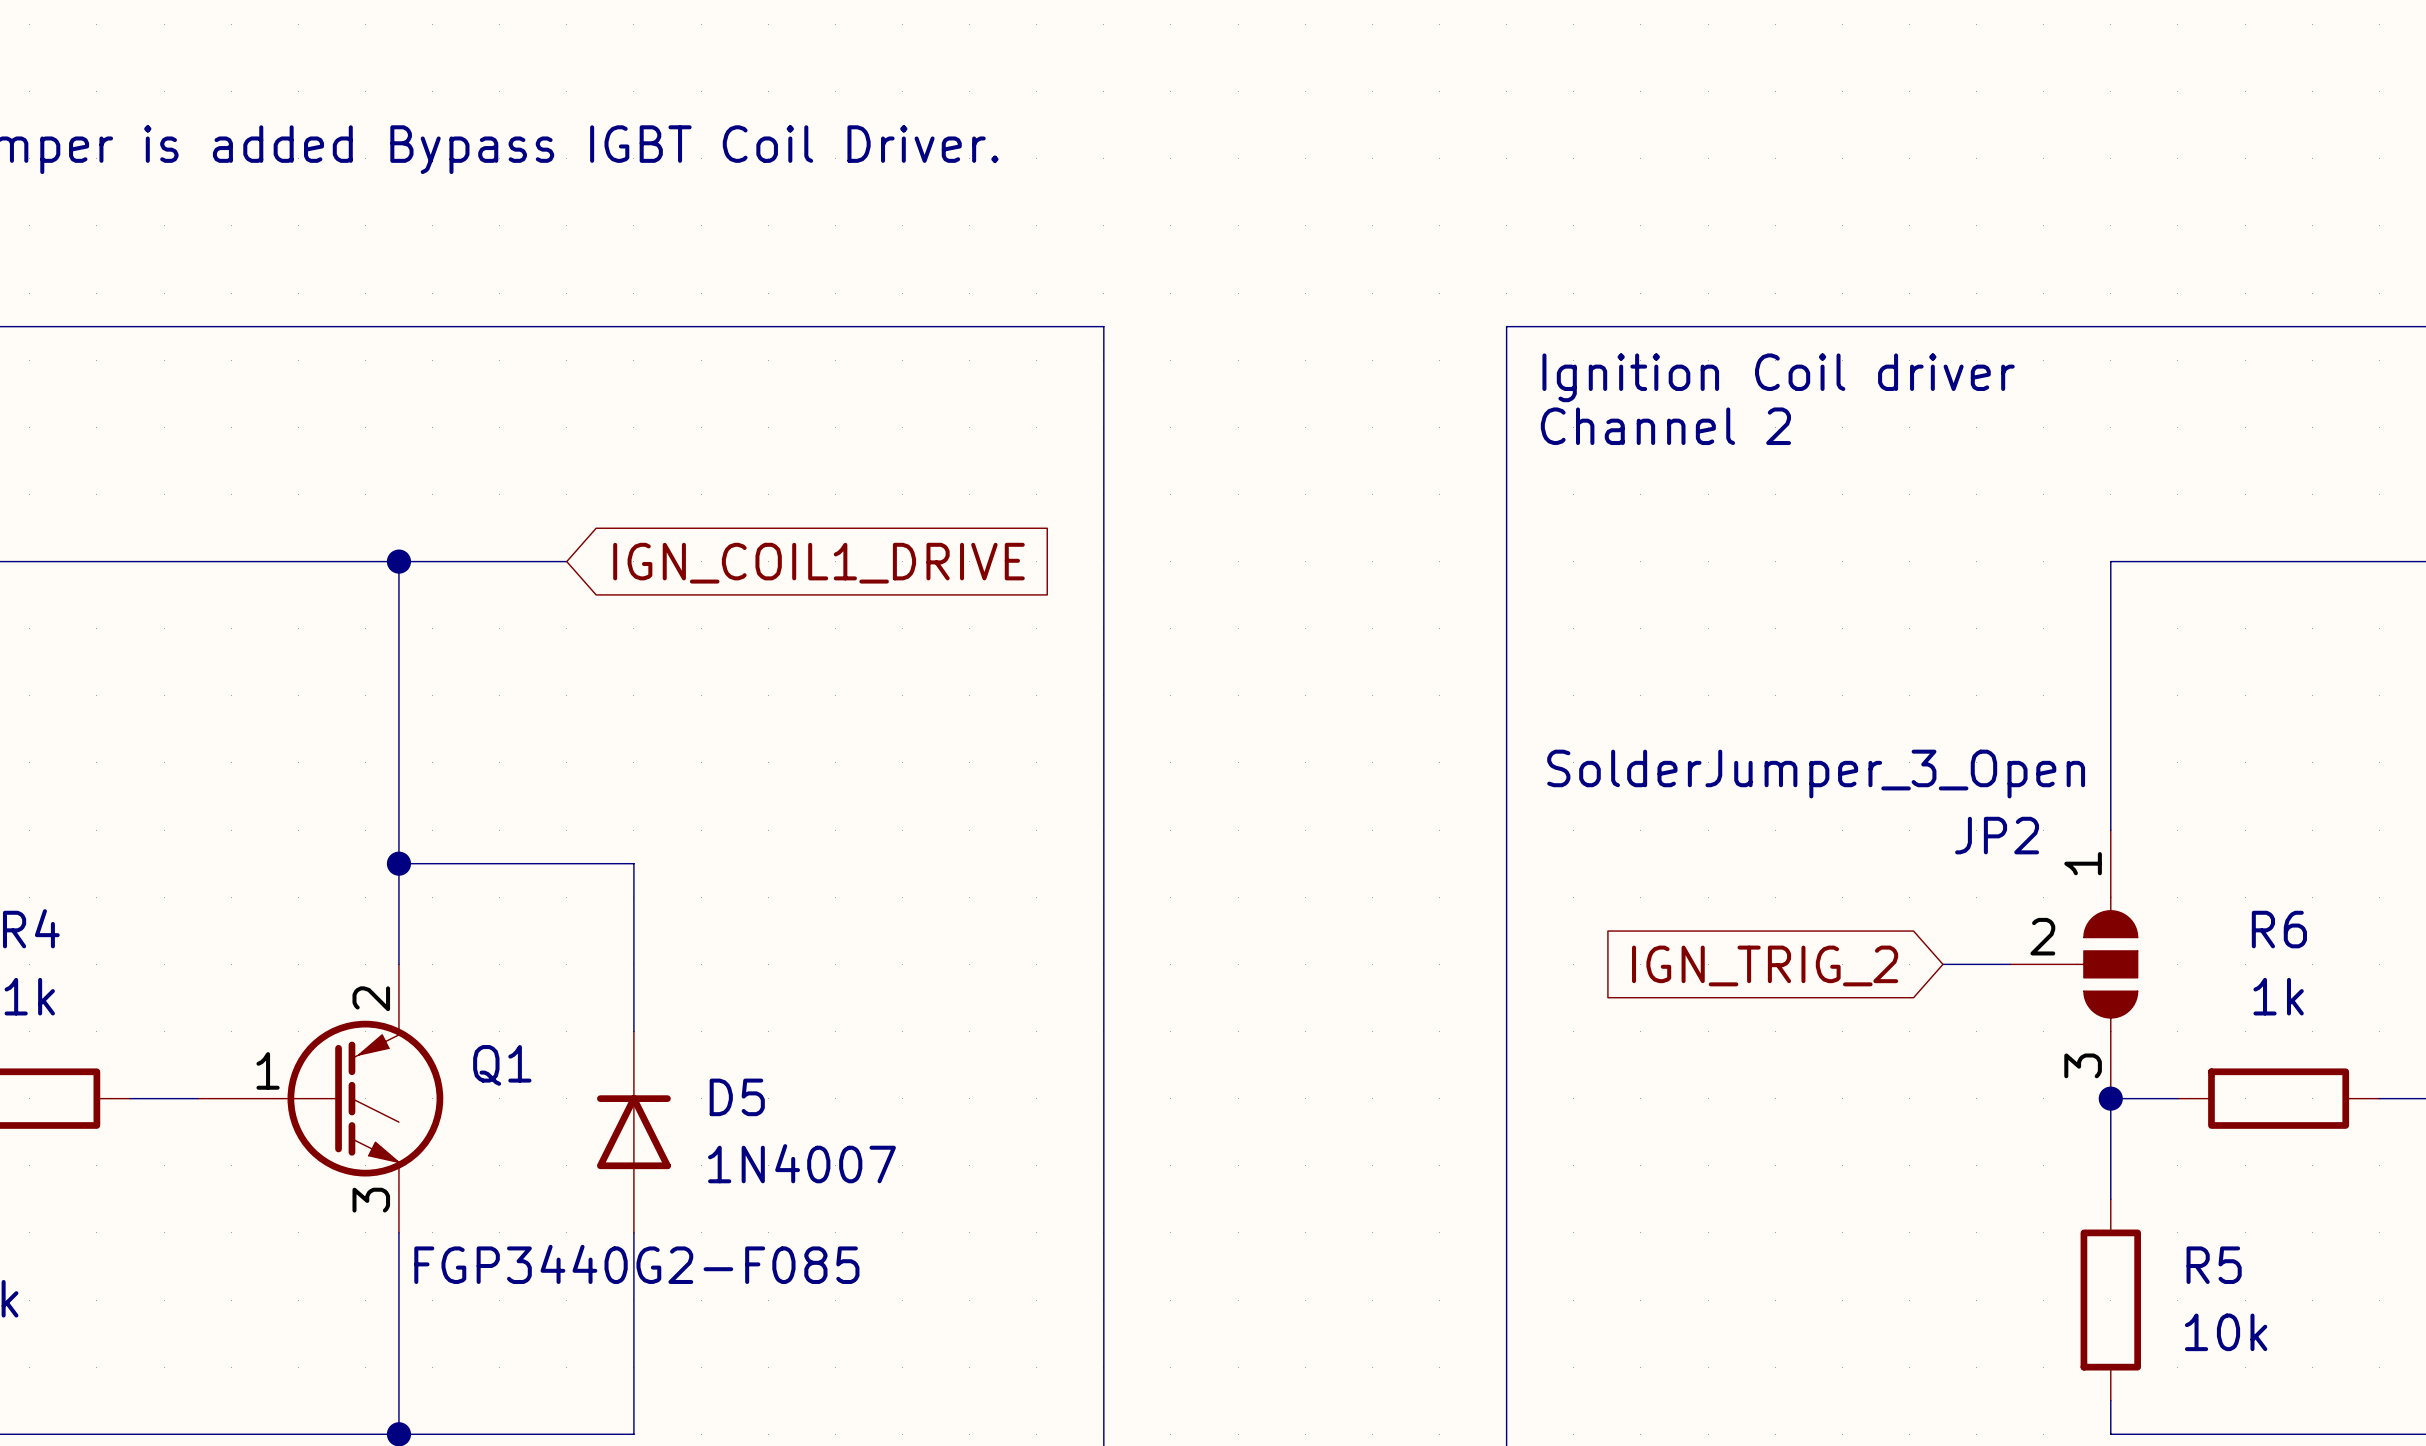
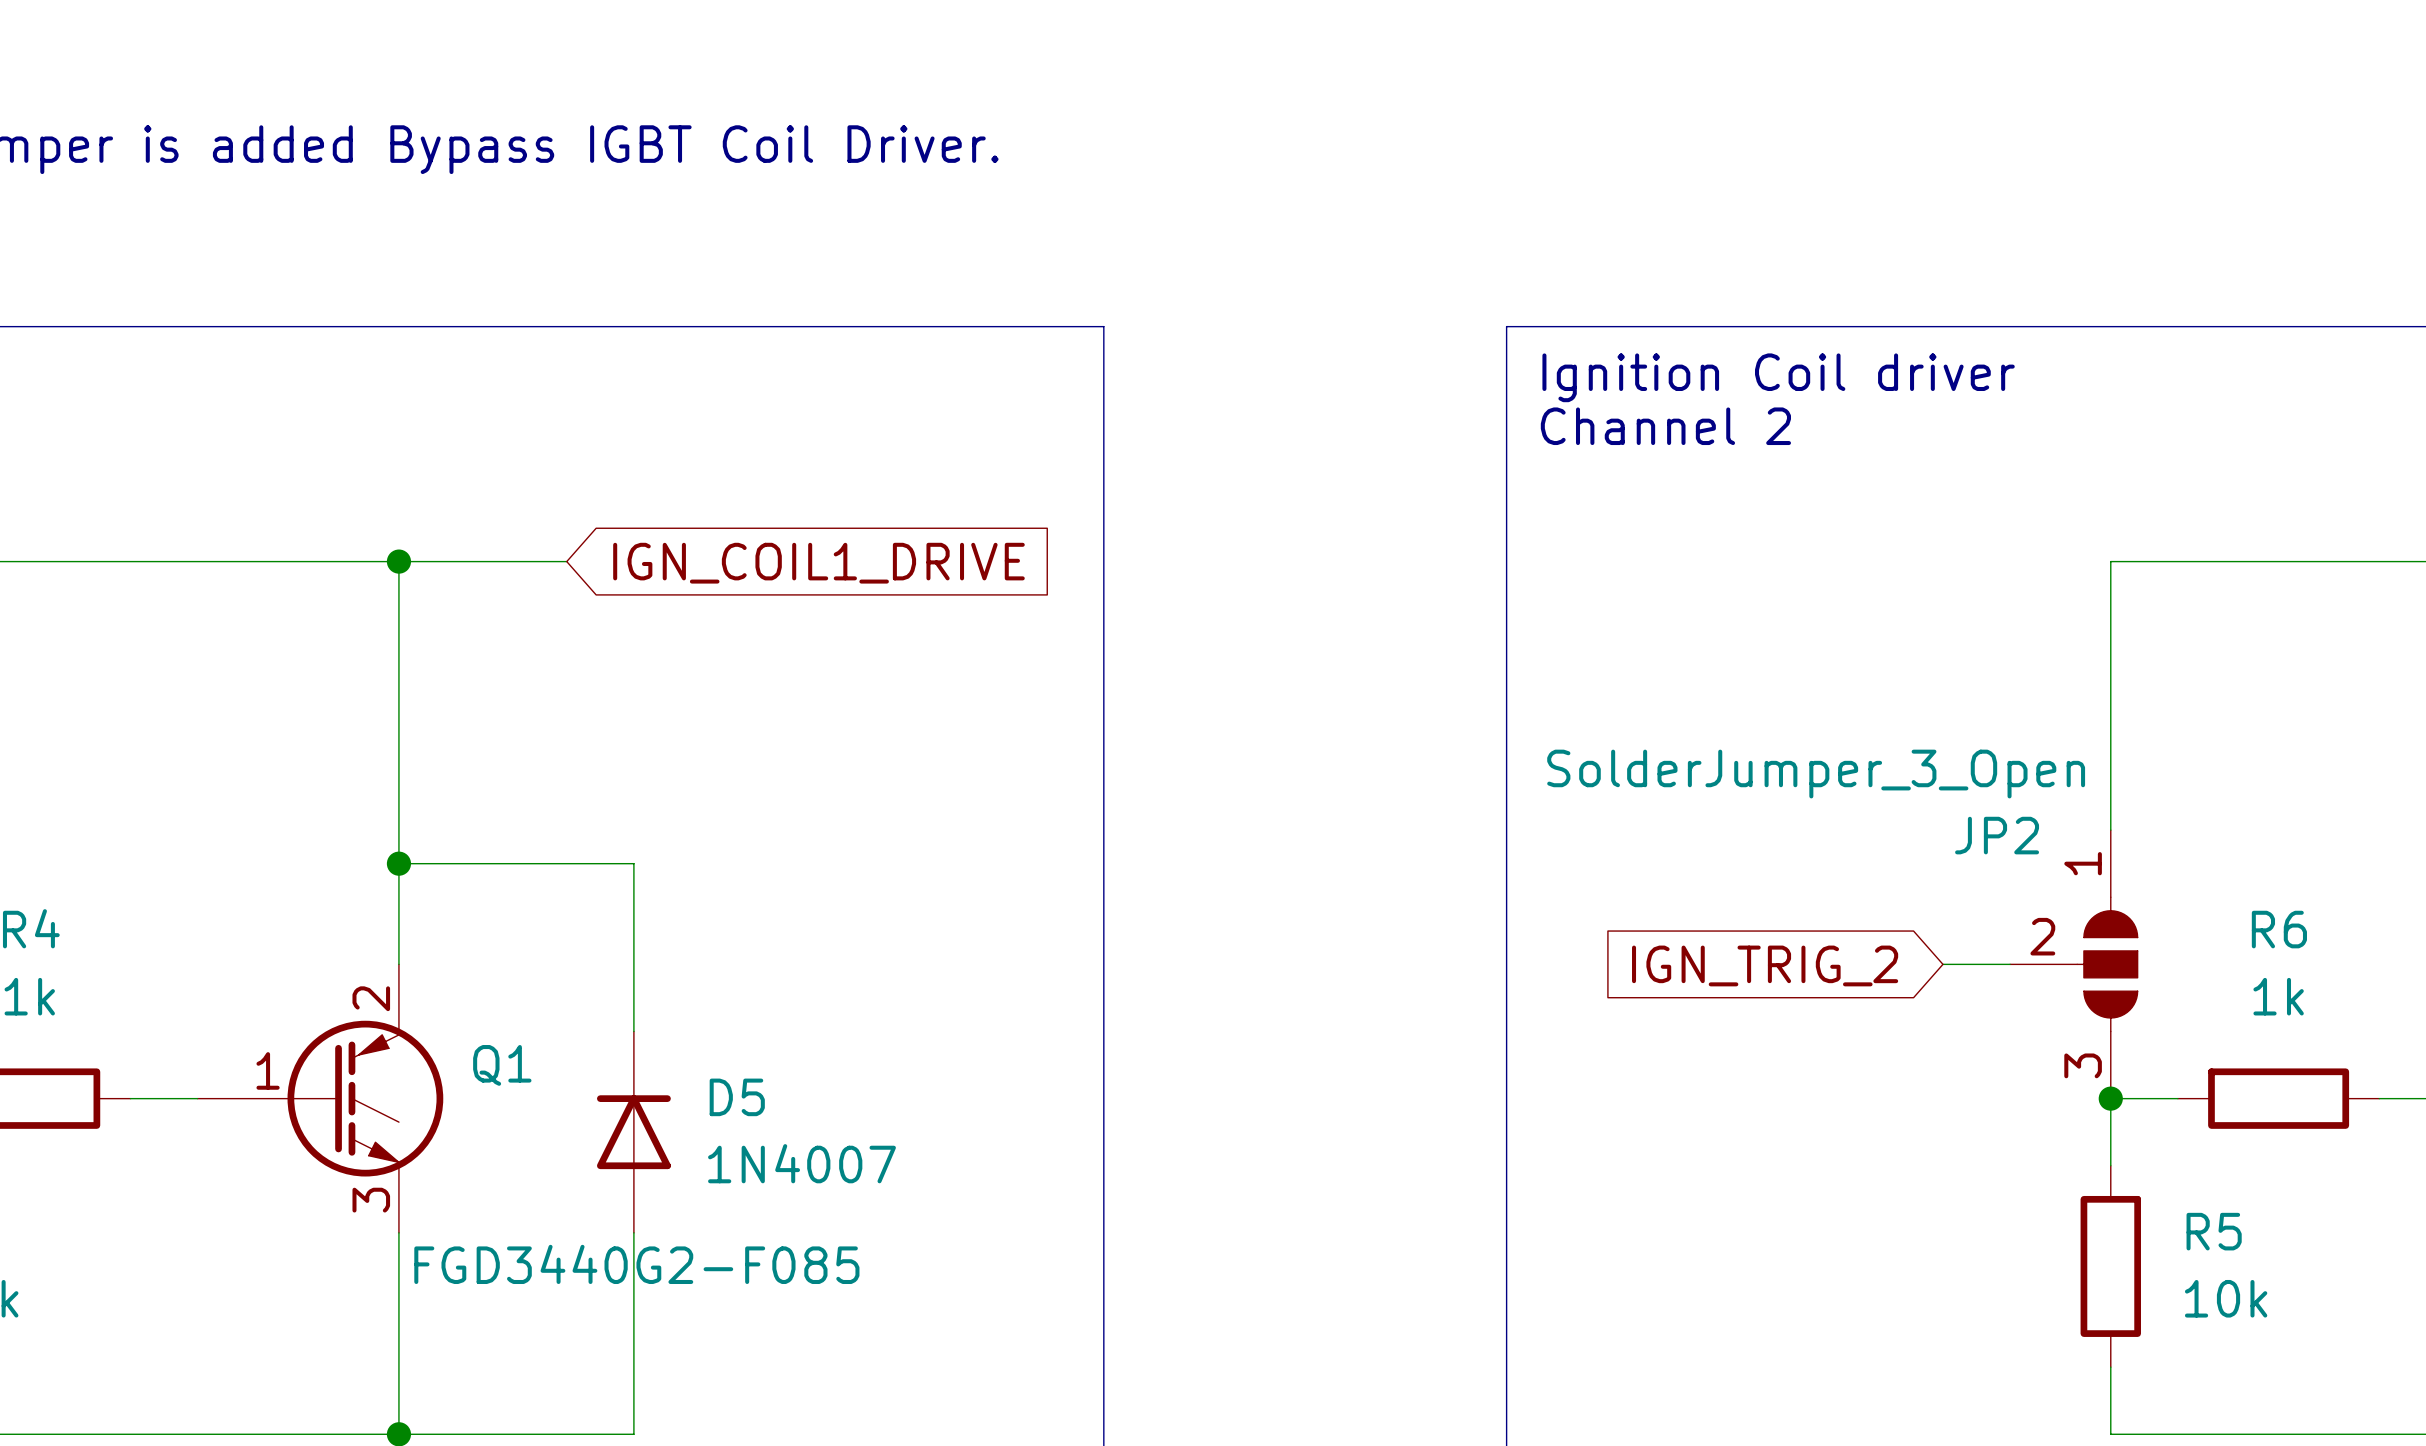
Q1 value: FGP3440G2-F085 (636, 1264) -> FGD3440G2-F085 (636, 1264)
R5 position: (2110, 1300) -> (2110, 1266)

